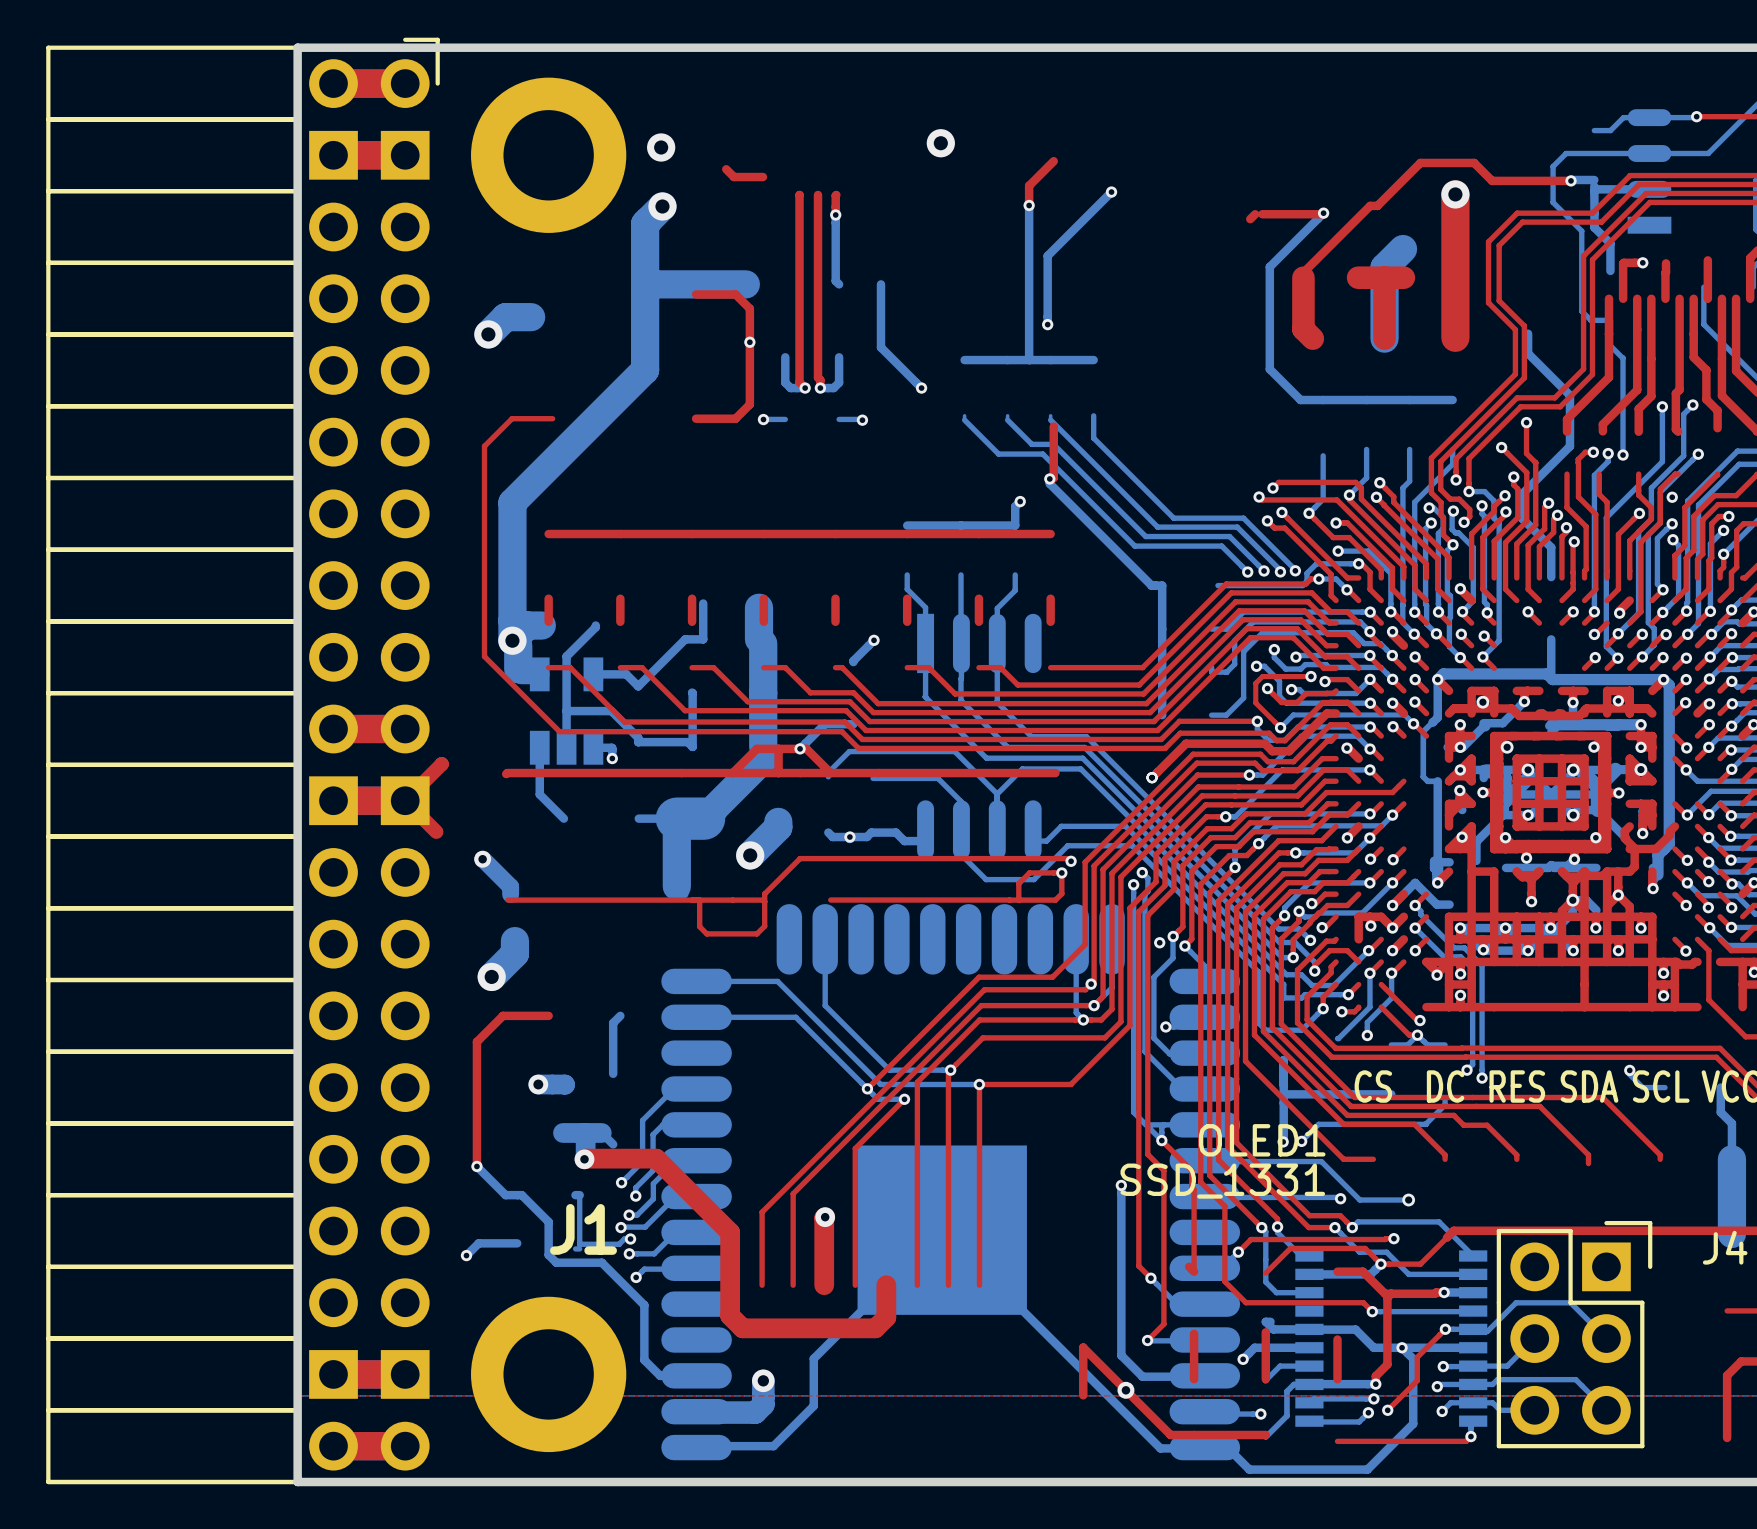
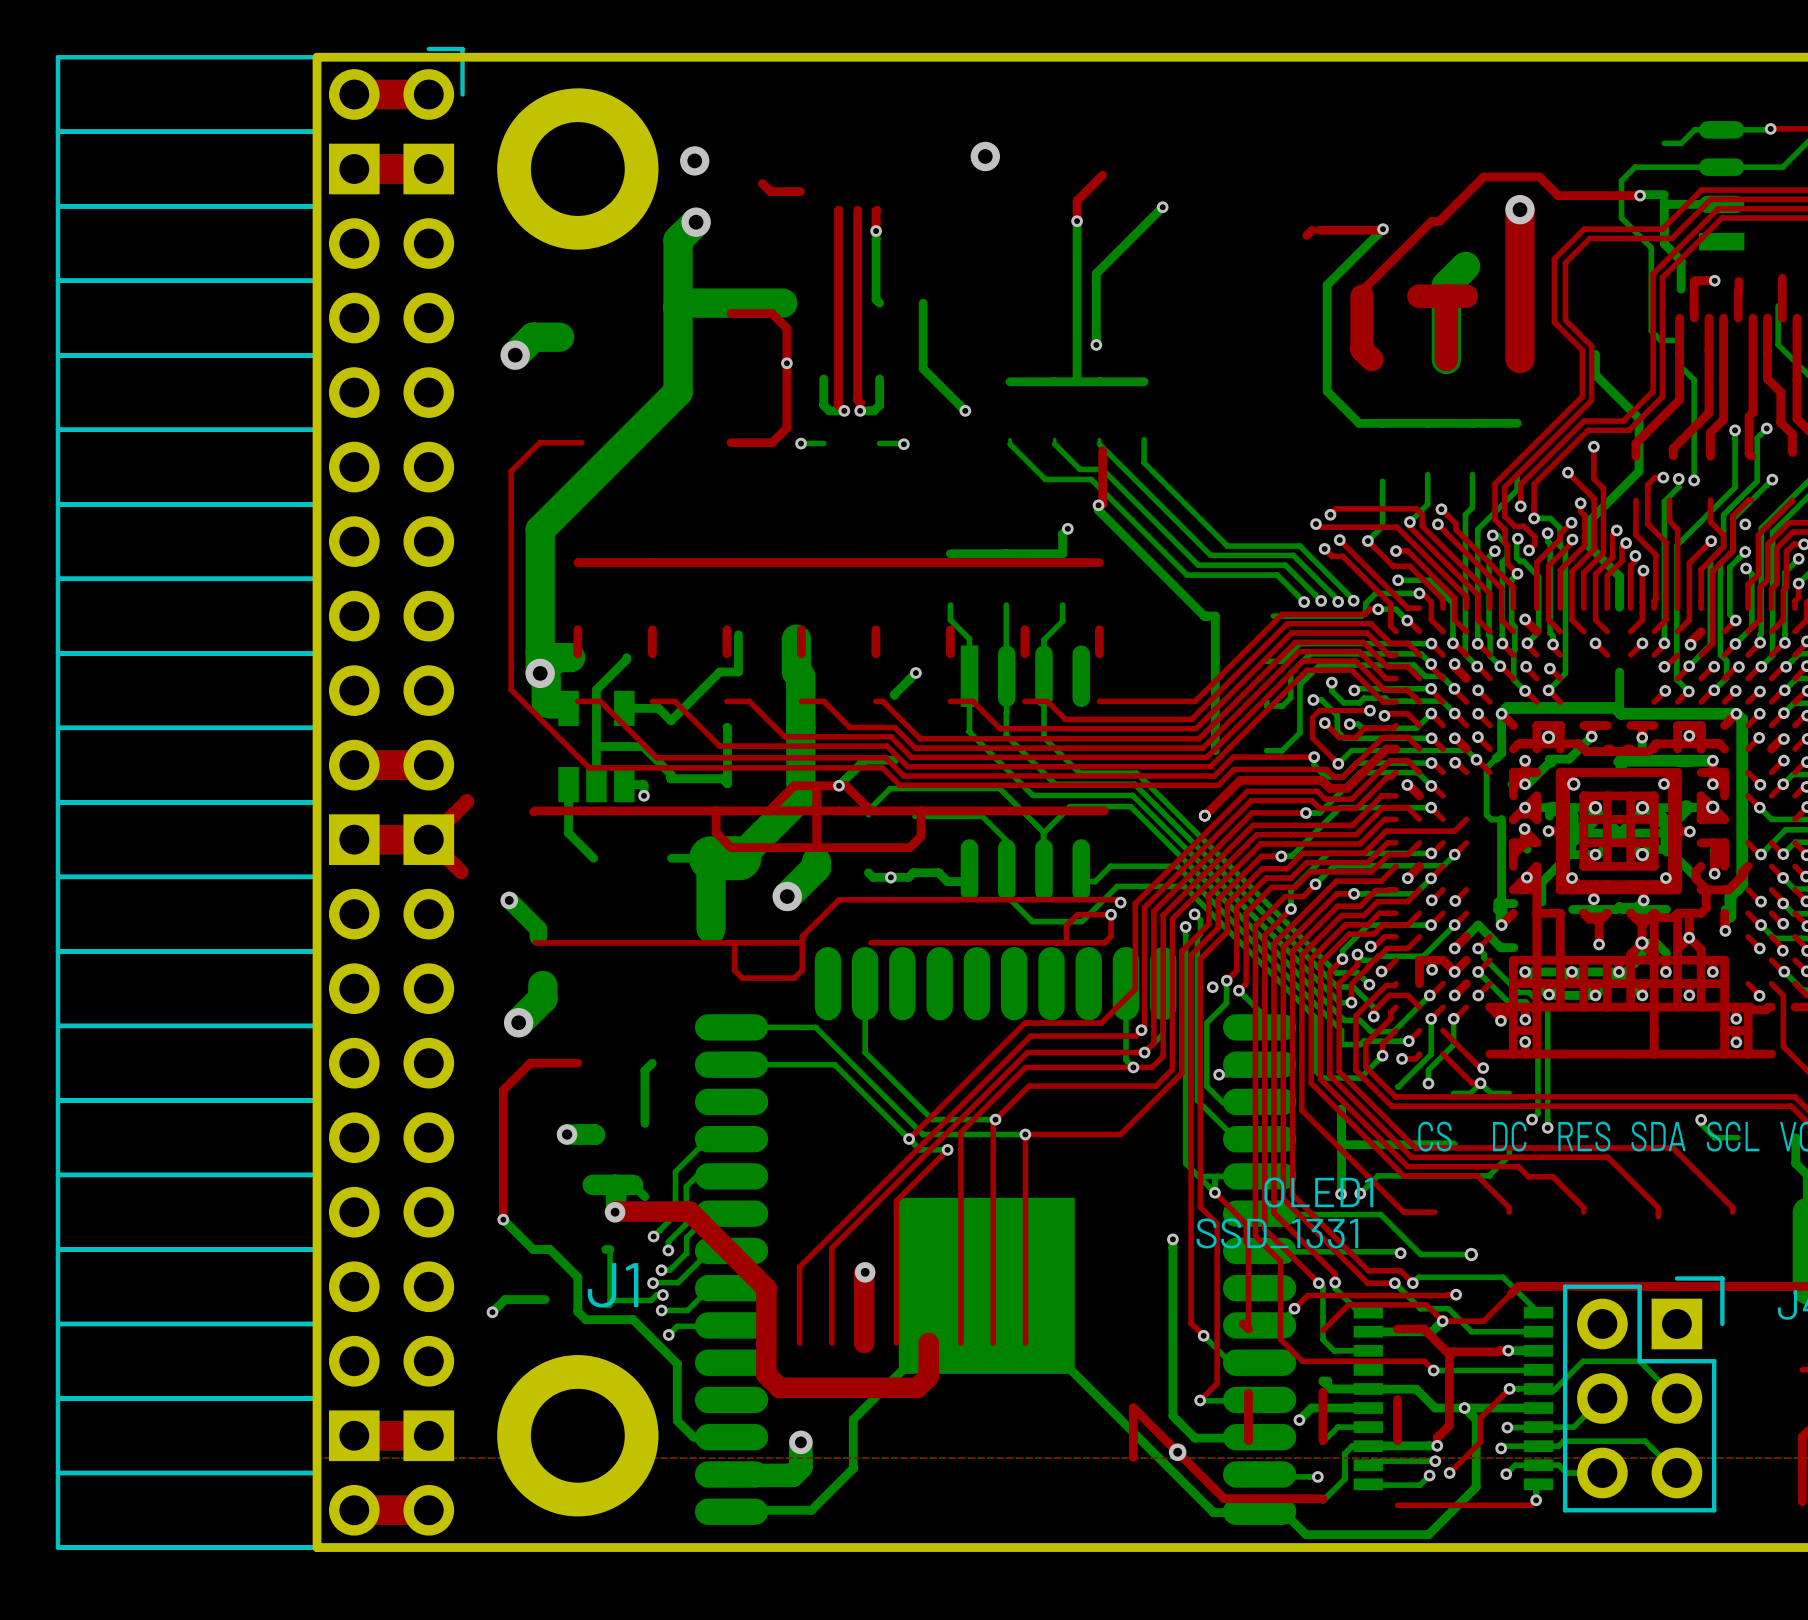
top track: none -> (716, 810) (716, 832) (731, 847) (909, 847) (921, 836) (921, 810)
top track: none -> (816, 810) (816, 847)

